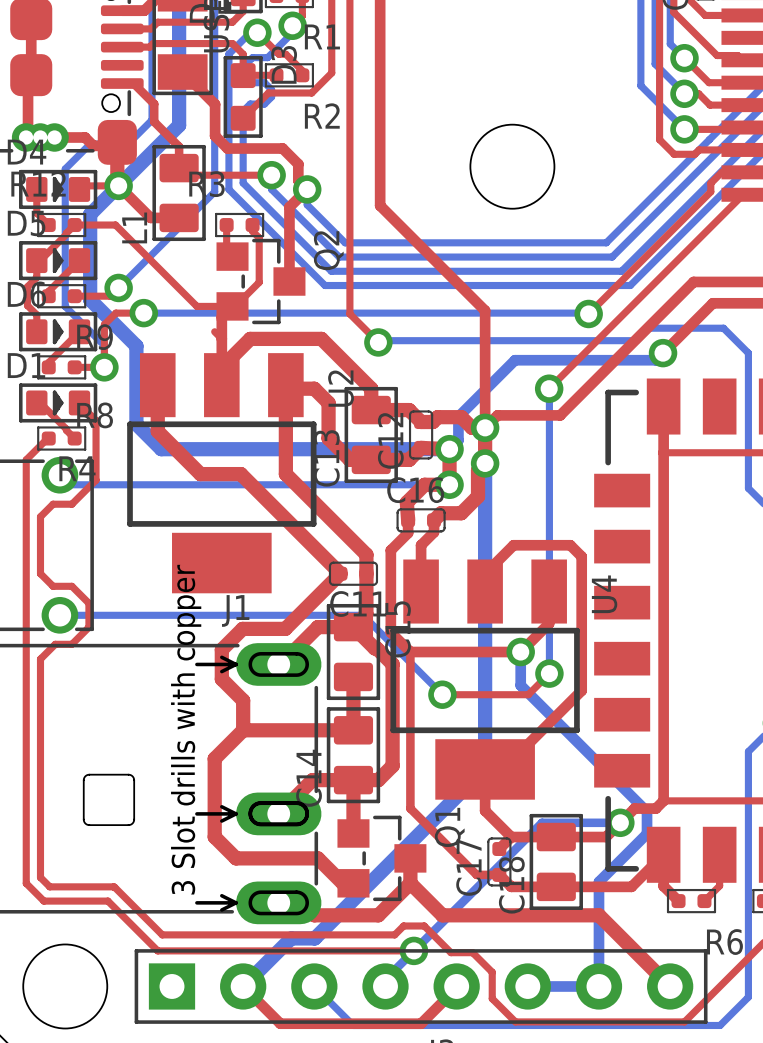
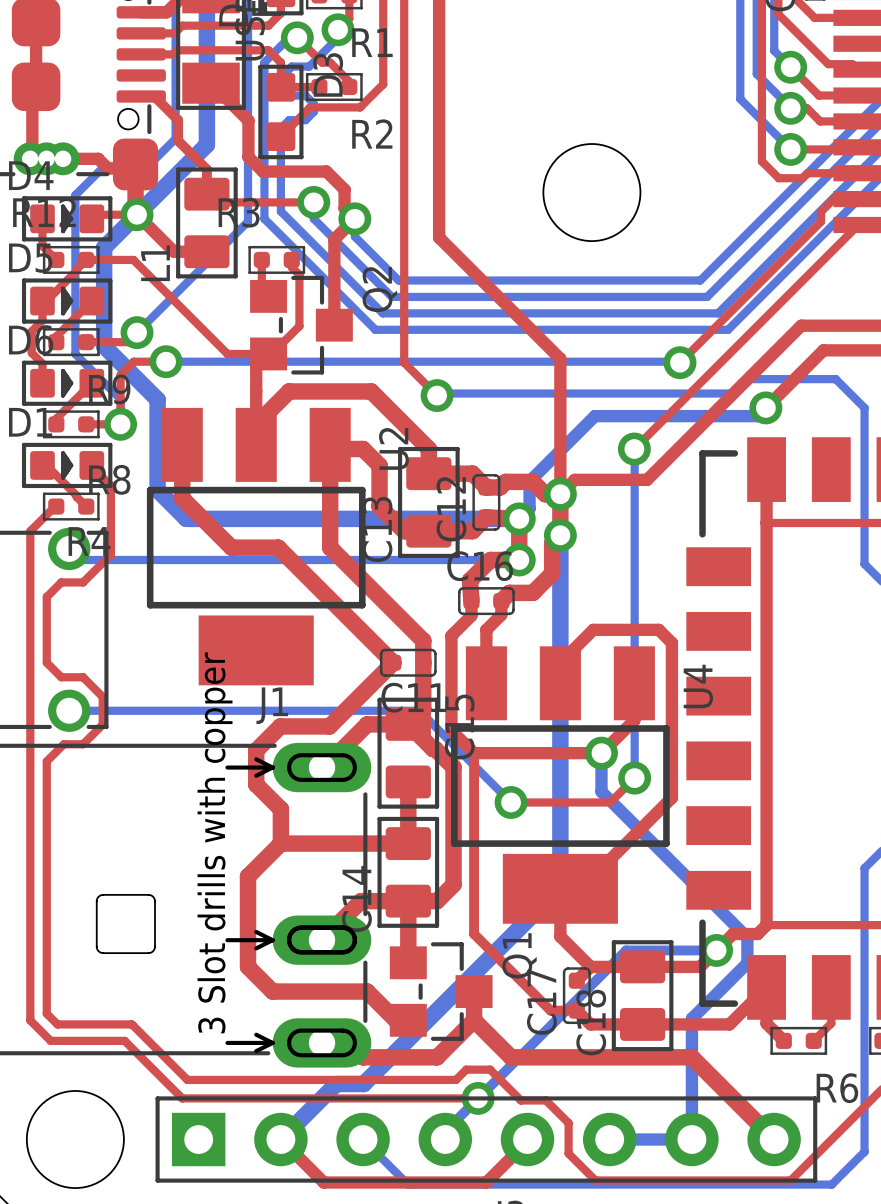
top track: (214, 331) (221, 338) -> none

